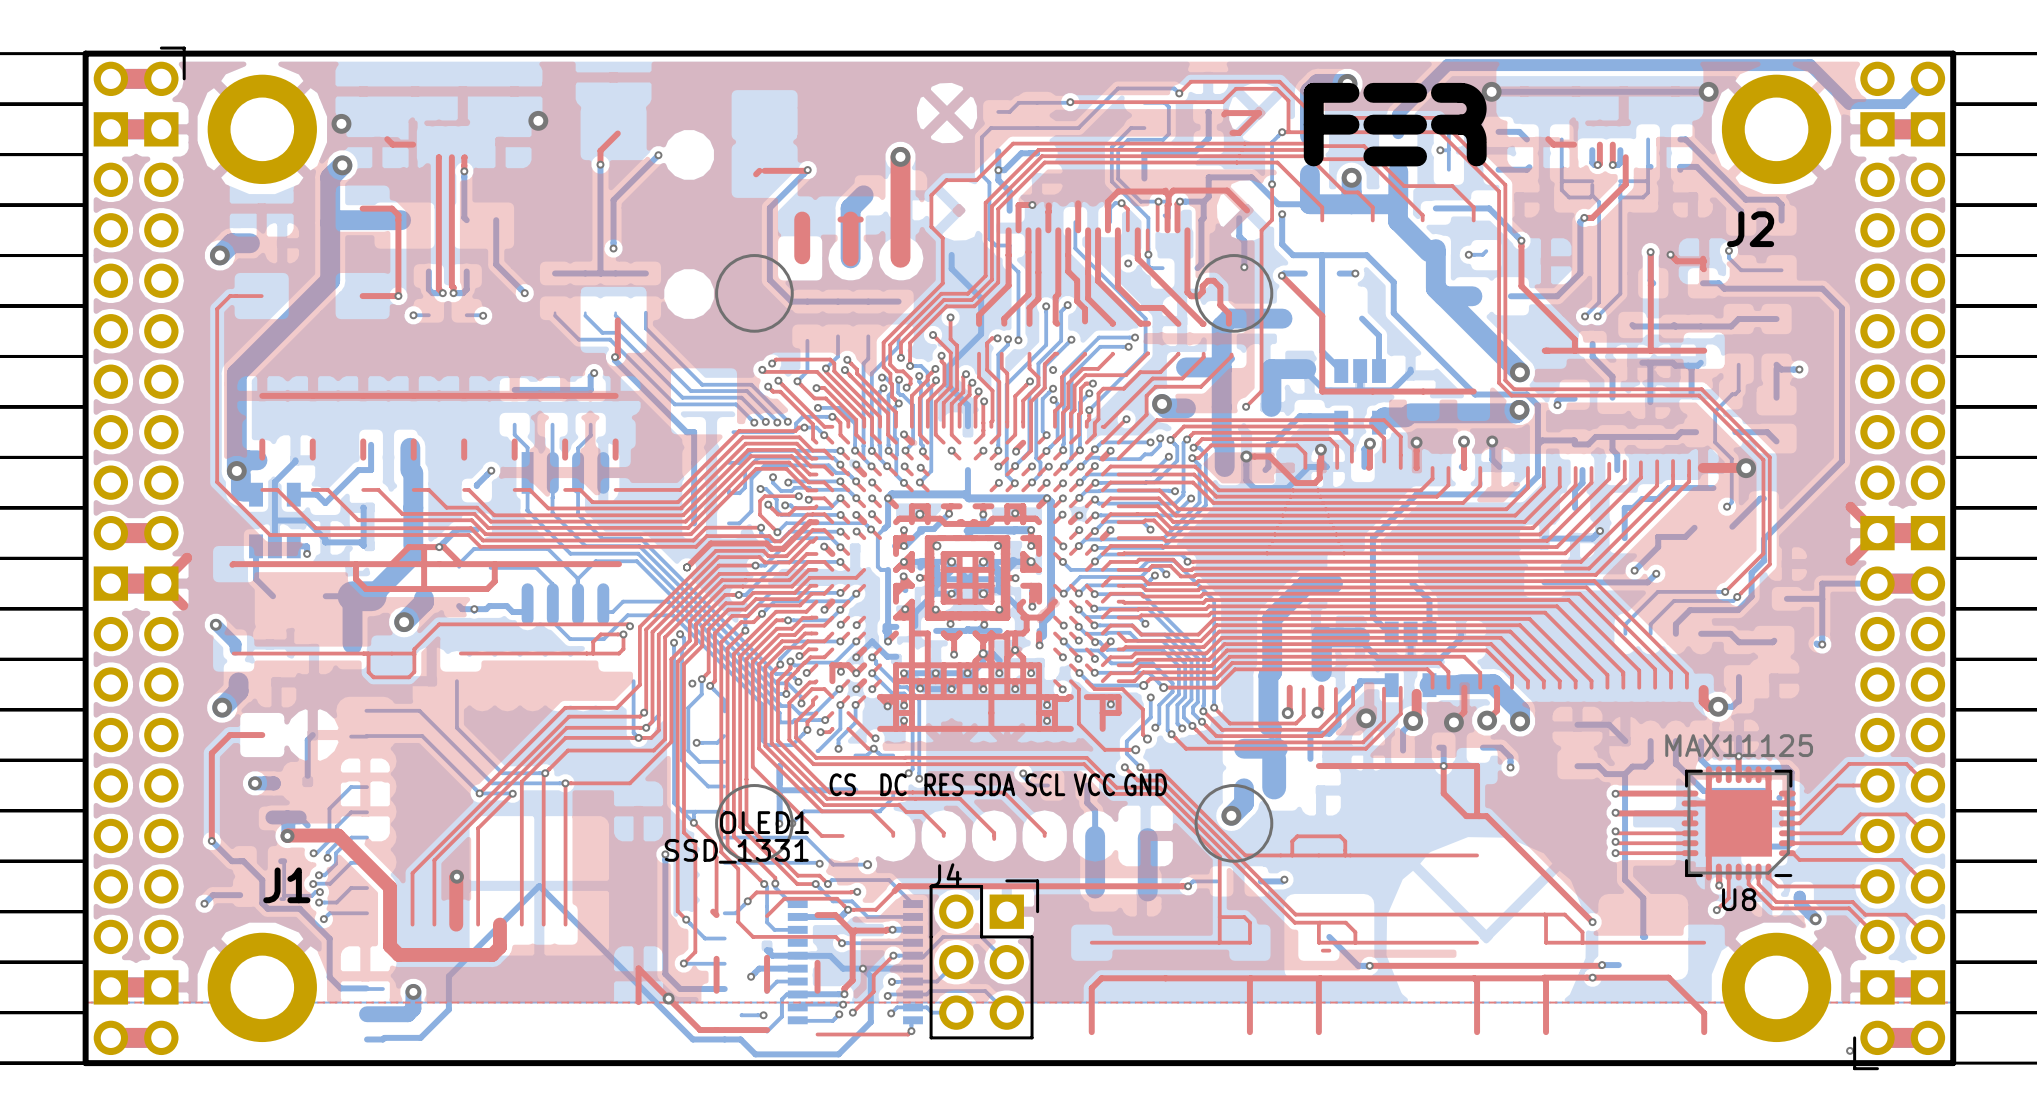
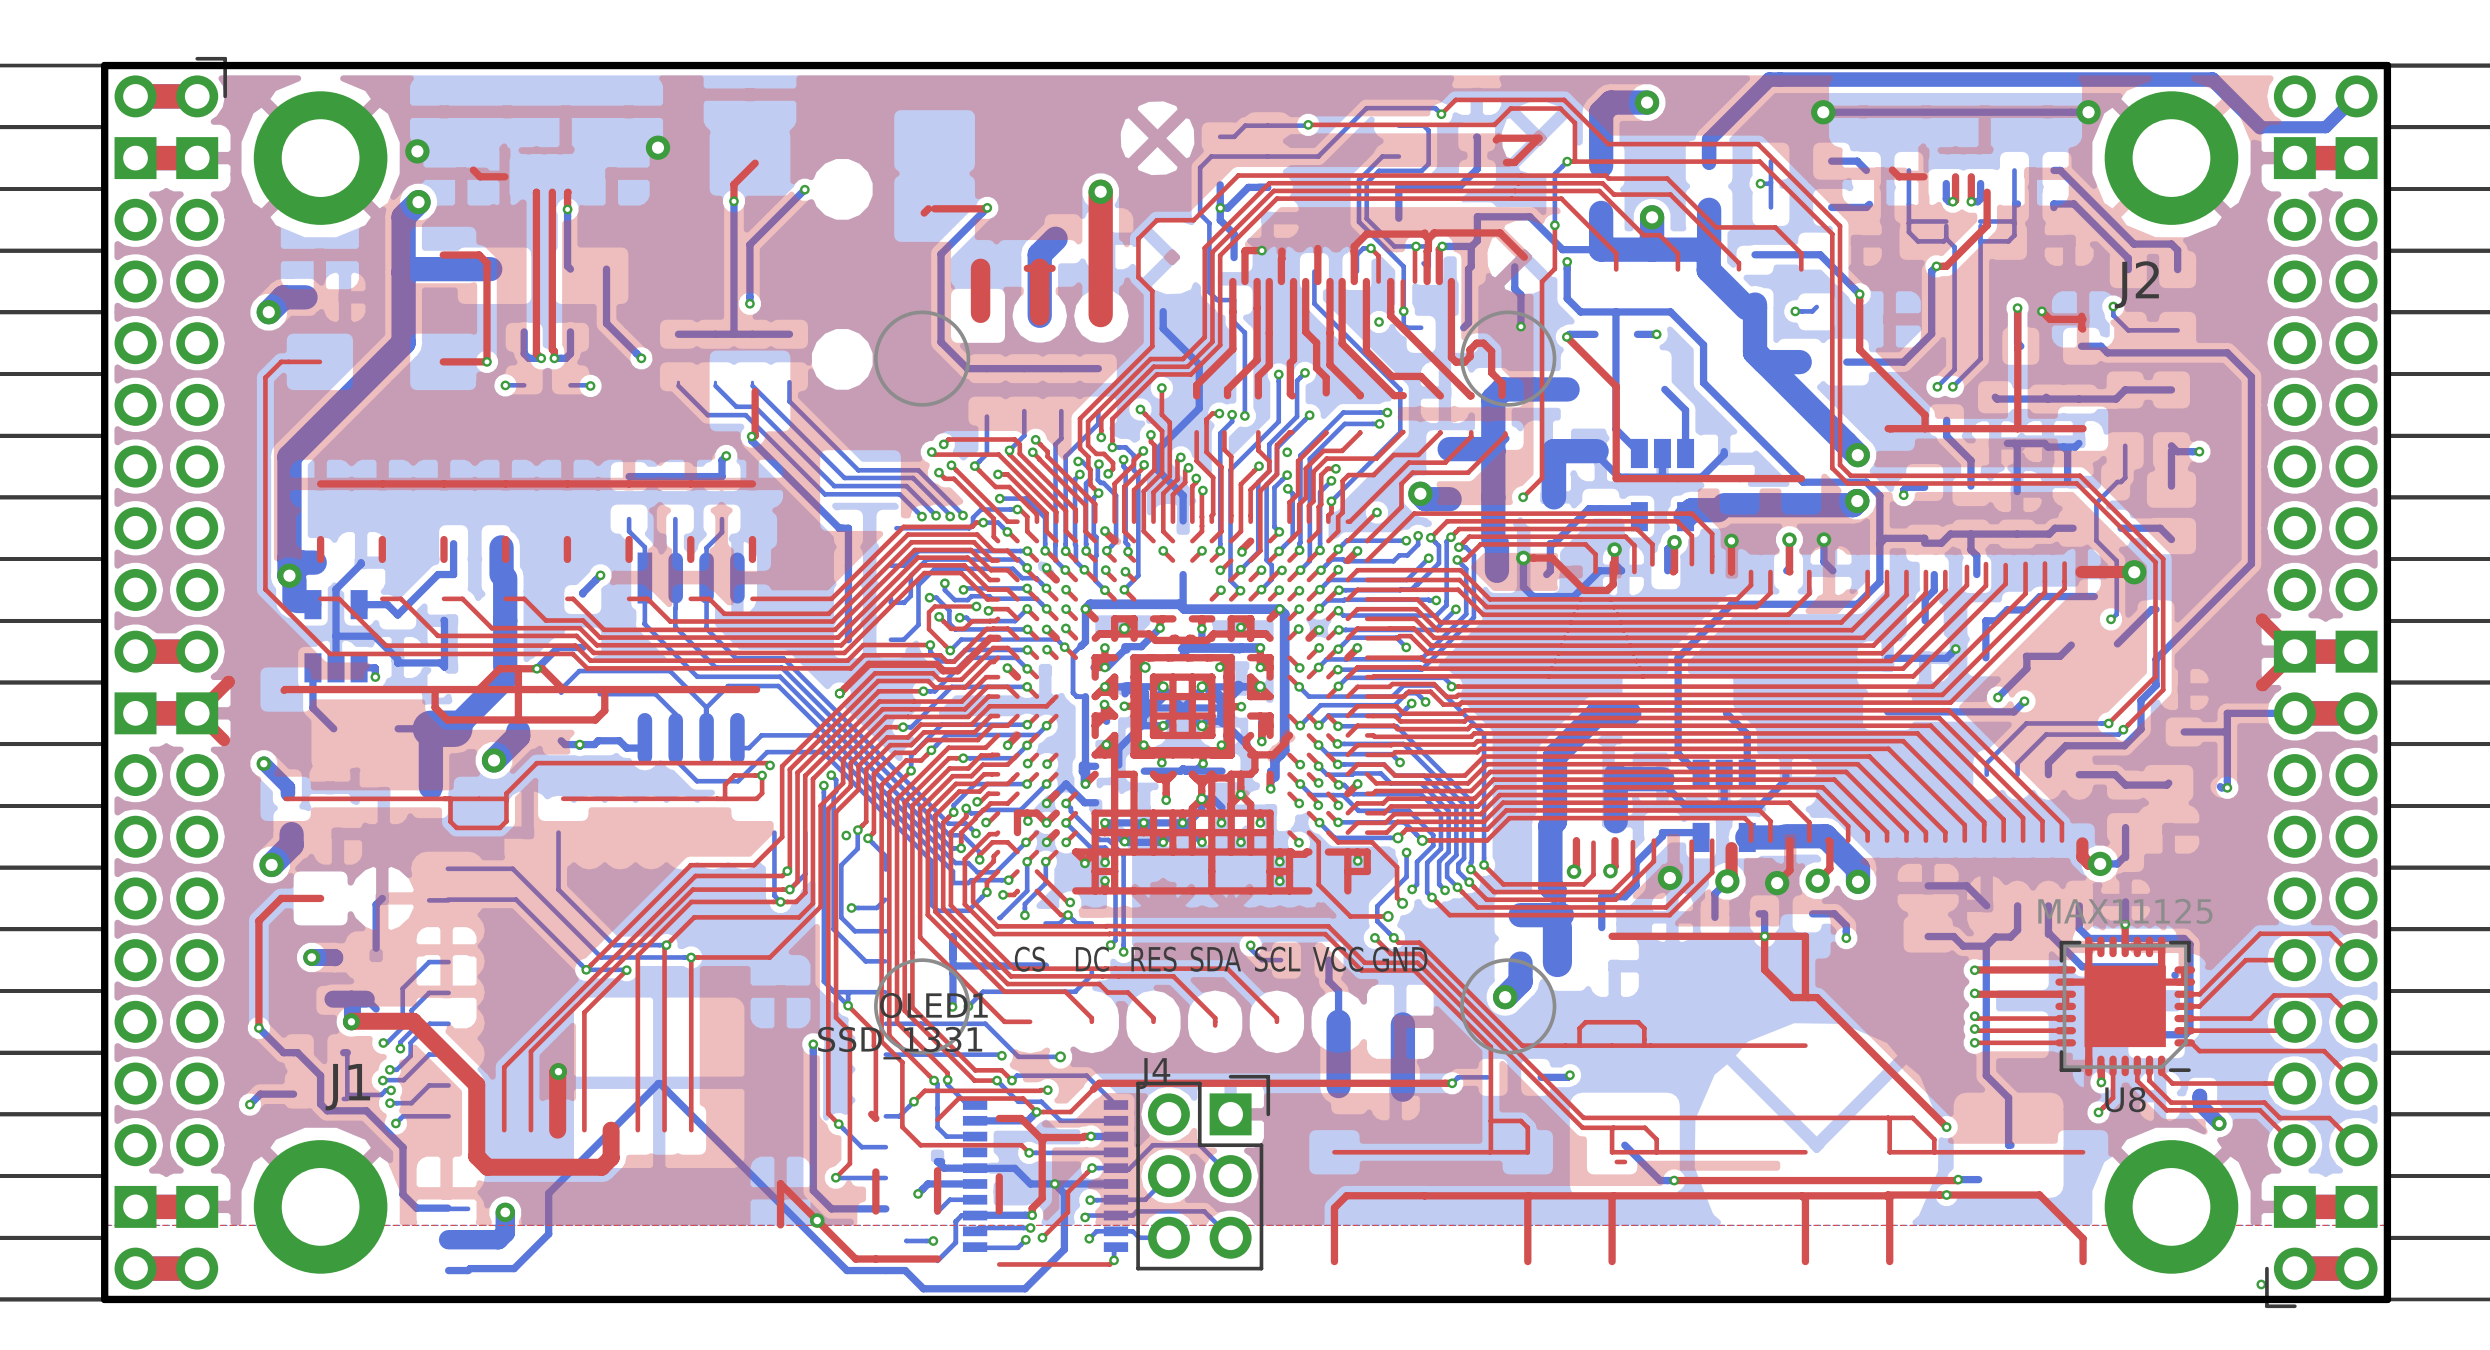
drawing: [1303, 82, 1487, 167] -> none

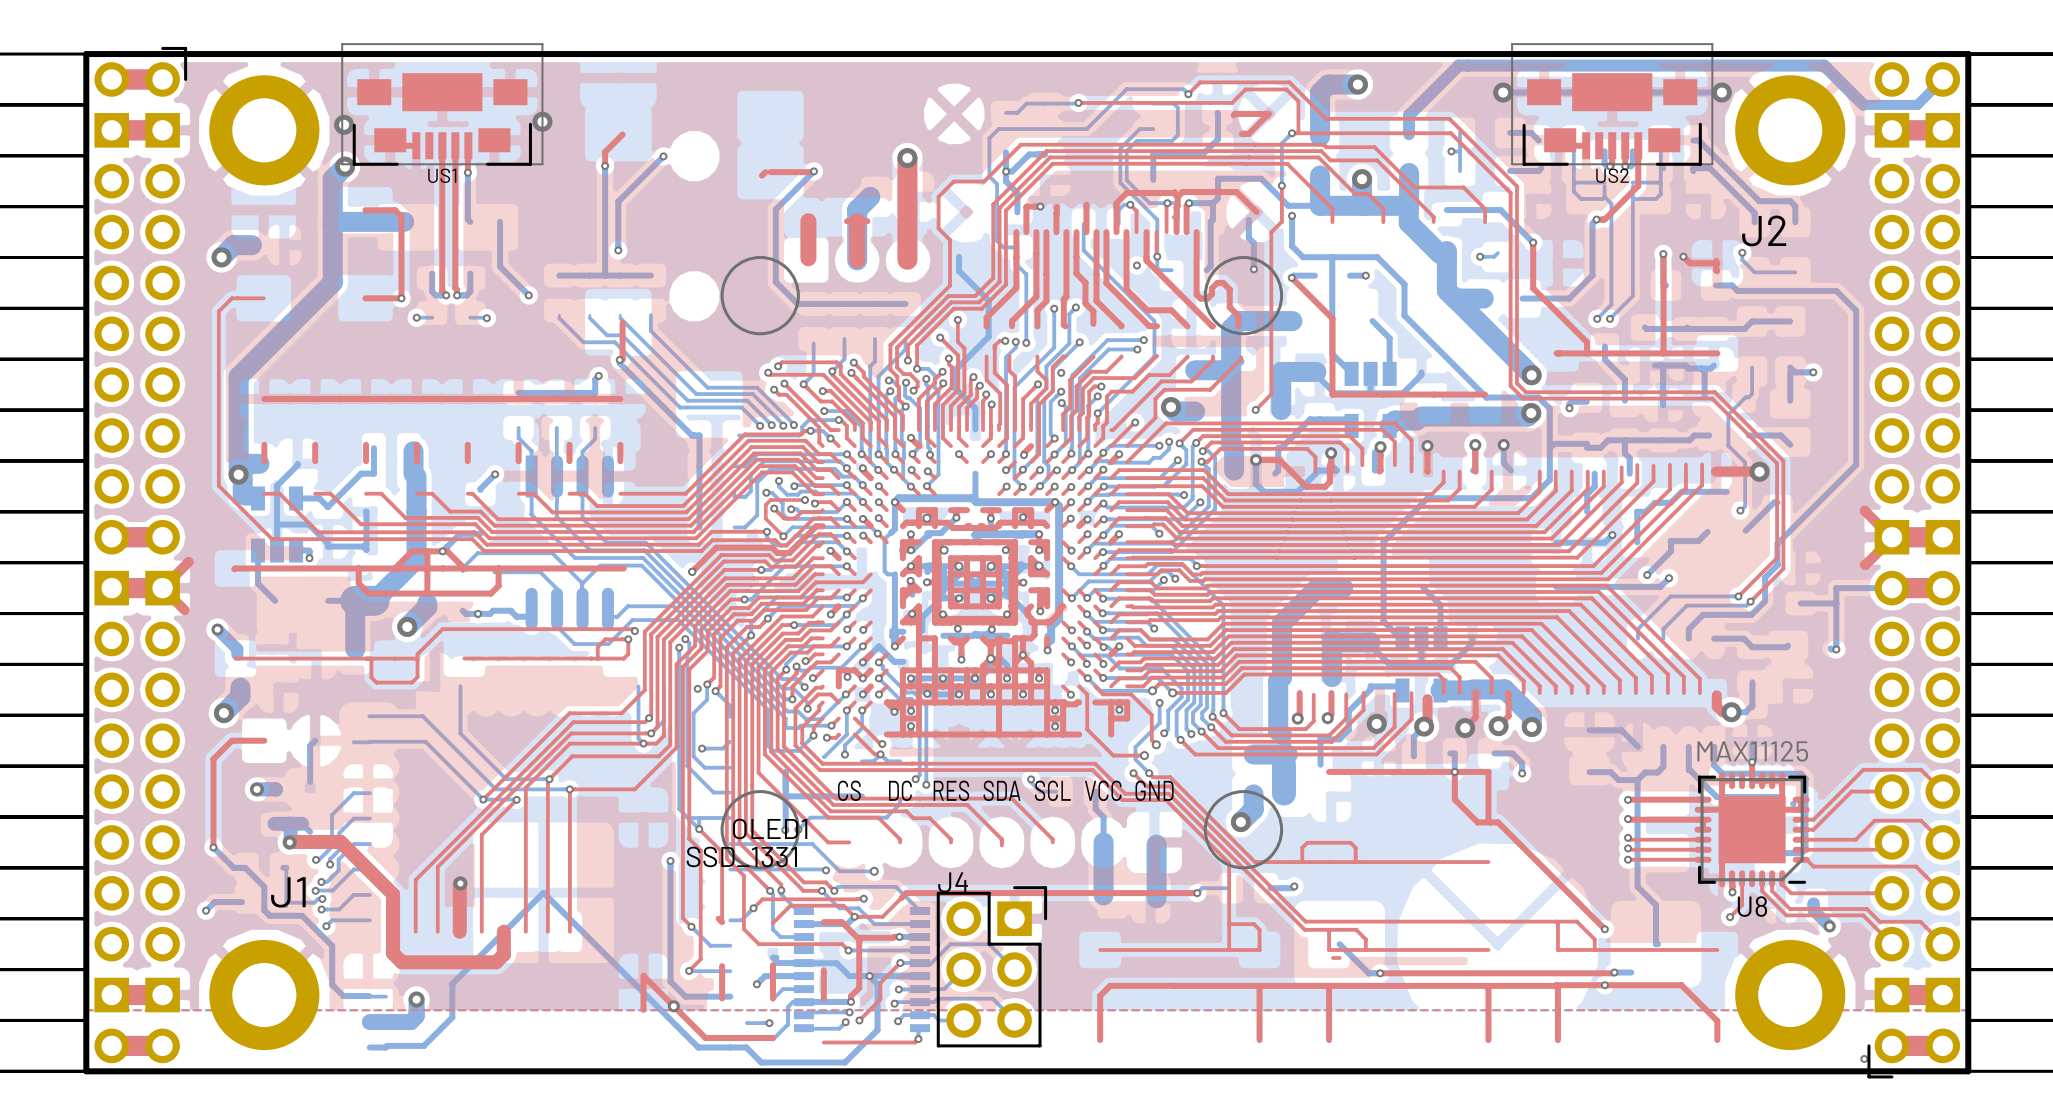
US1: none -> (442, 104)
US2: none -> (1612, 104)

